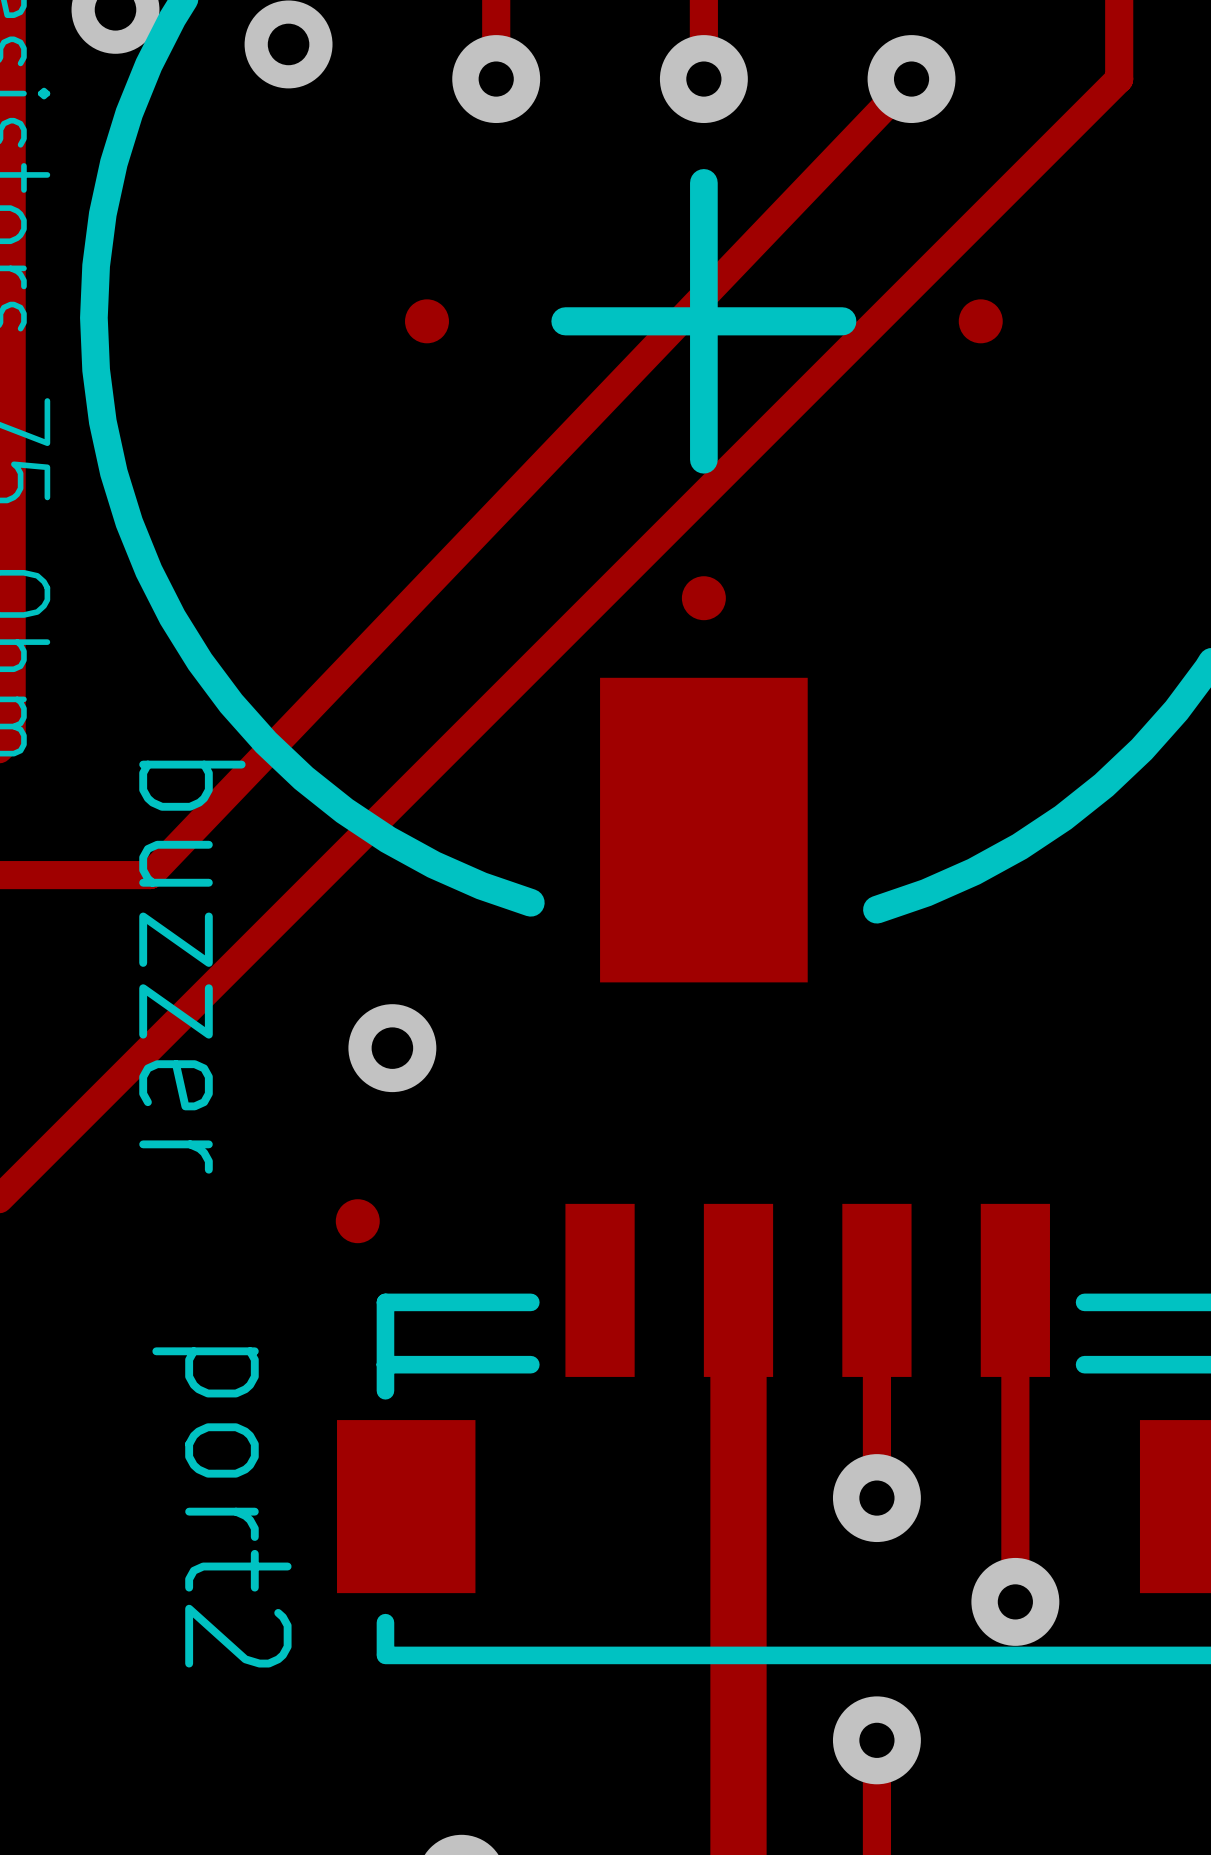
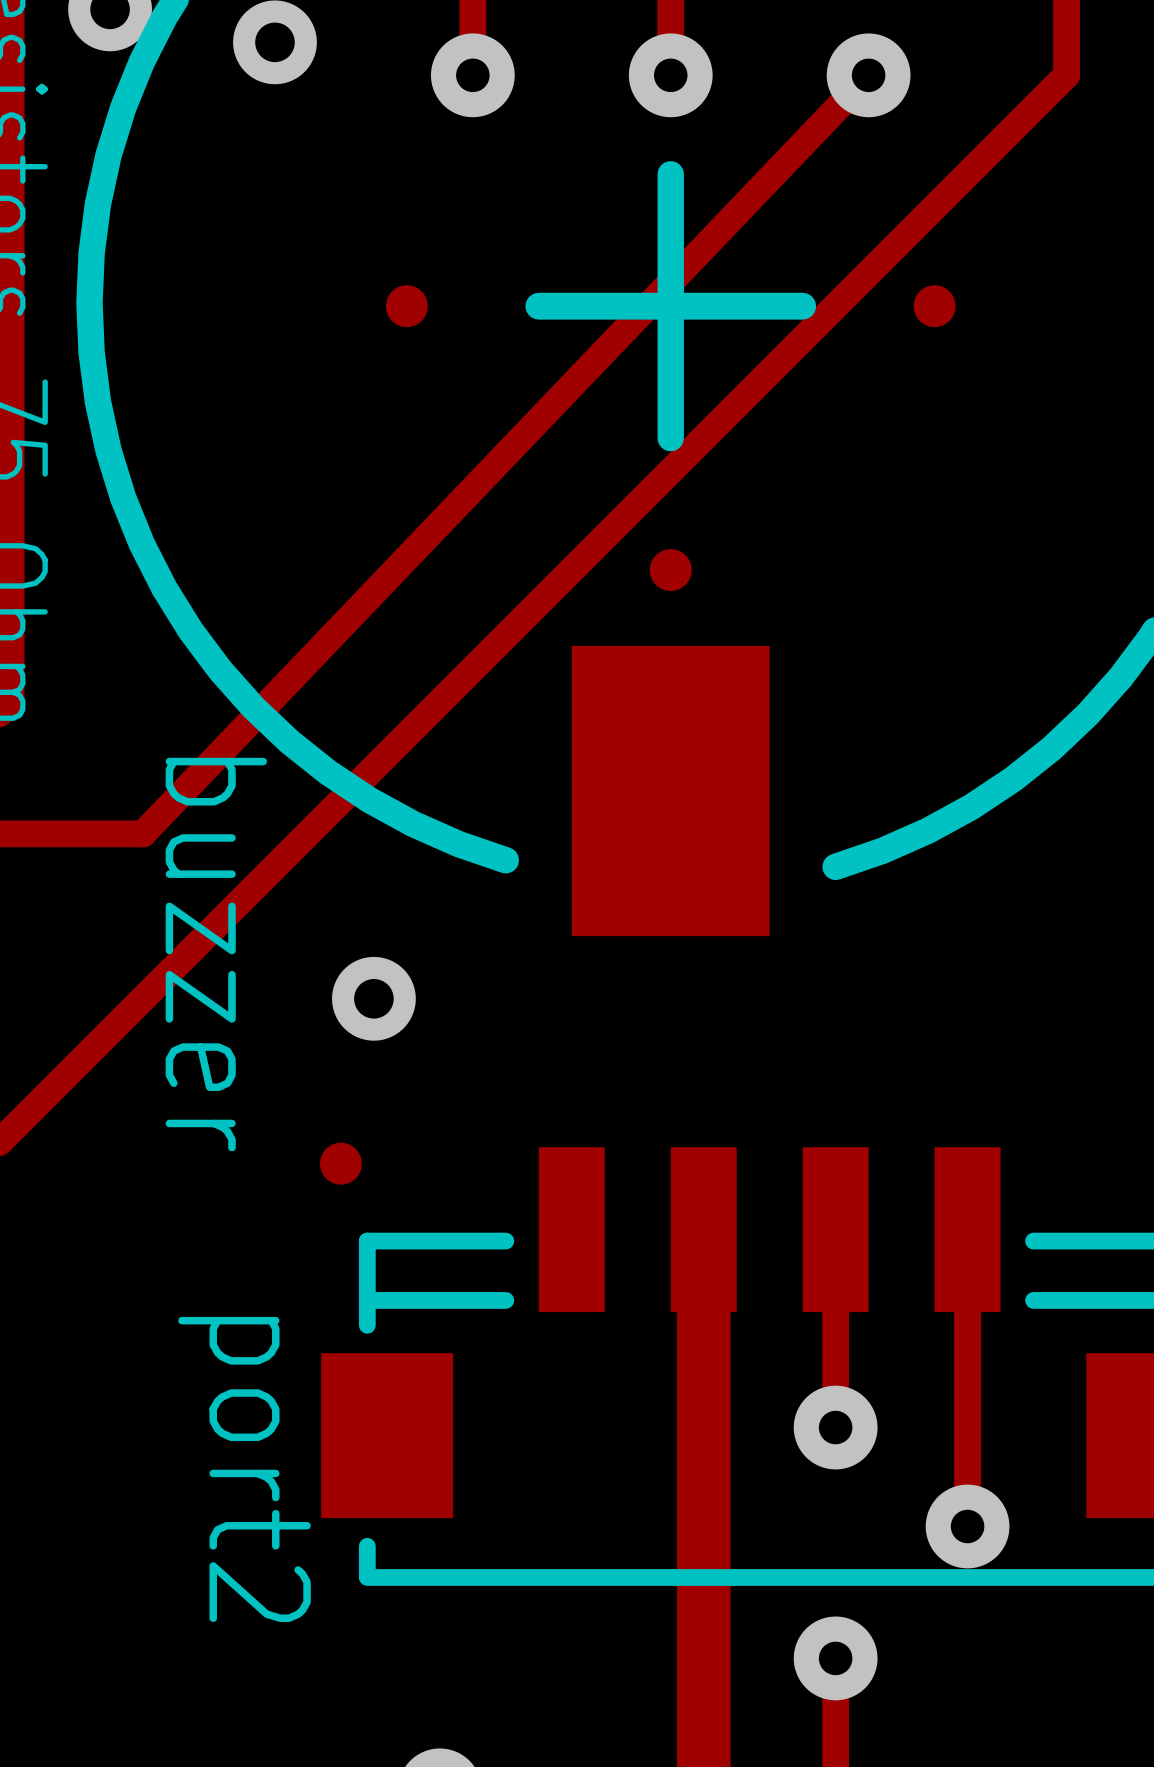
text position: buzzer (192, 967) -> buzzer (216, 954)
text position: port2 (221, 1507) -> port2 (244, 1469)

